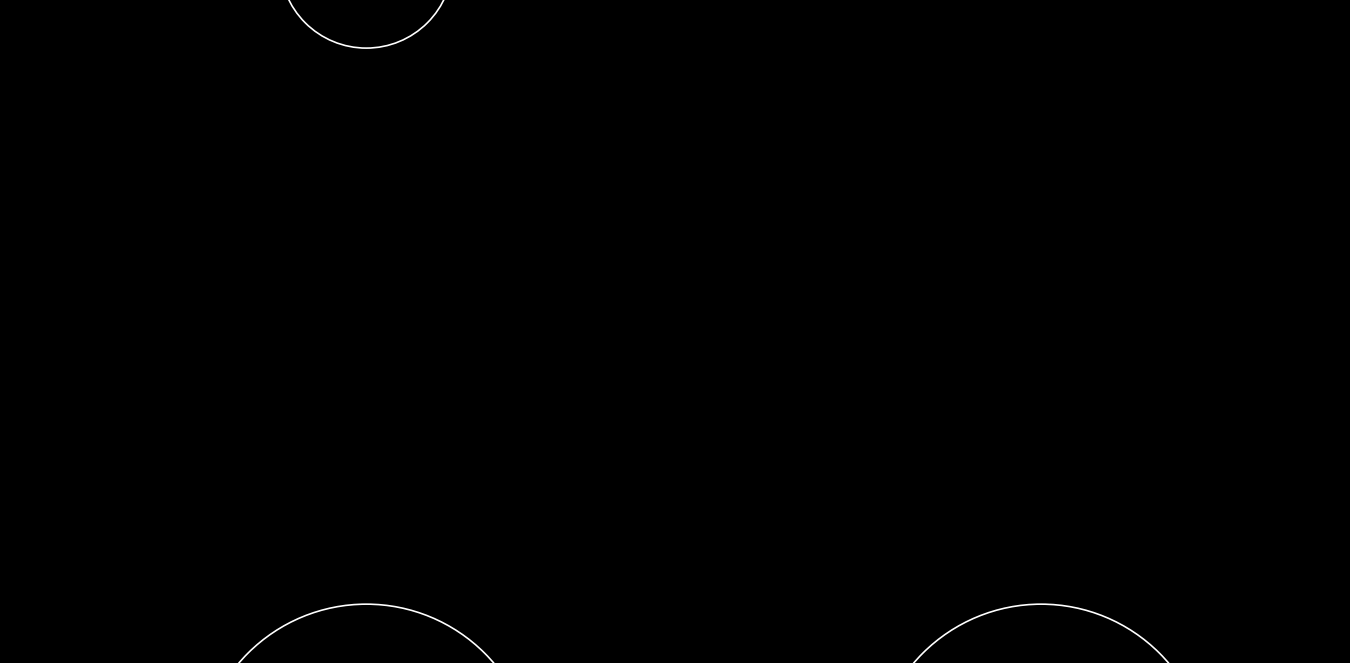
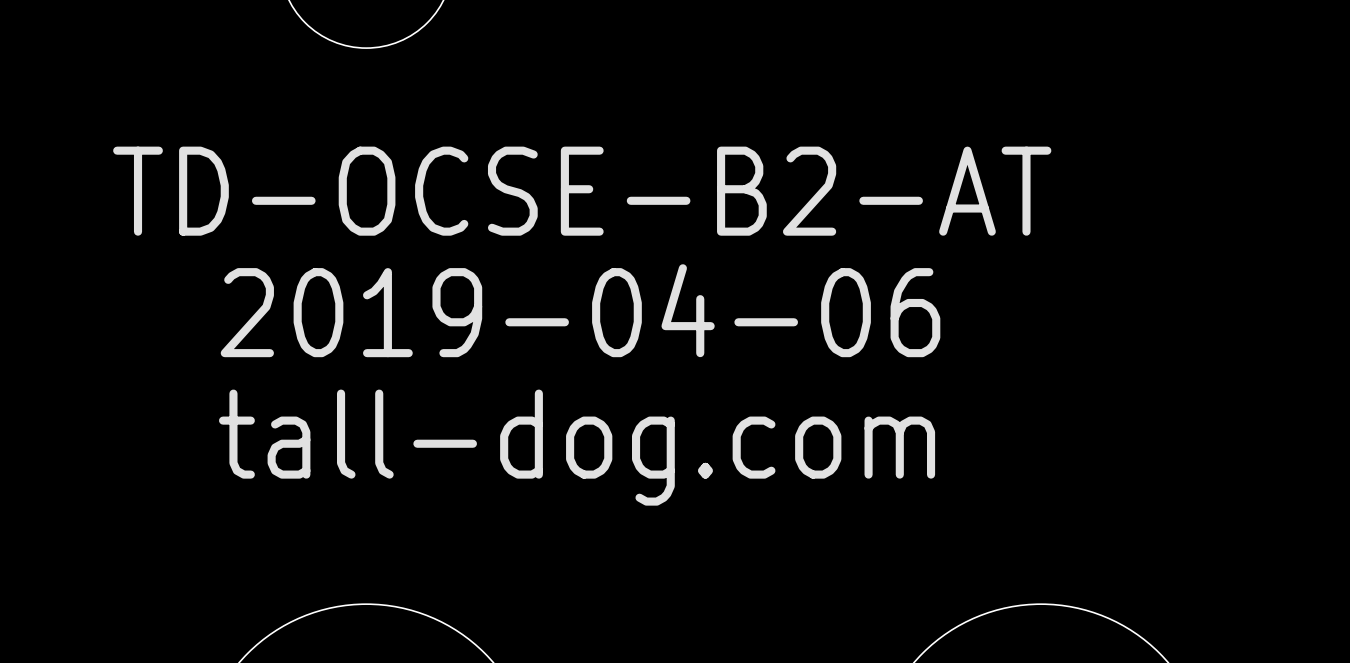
text: none -> TD-OCSE-B2-AT (582, 191)
text: none -> 2019-04-06 (580, 310)
text: none -> tall-dog.com (577, 447)

